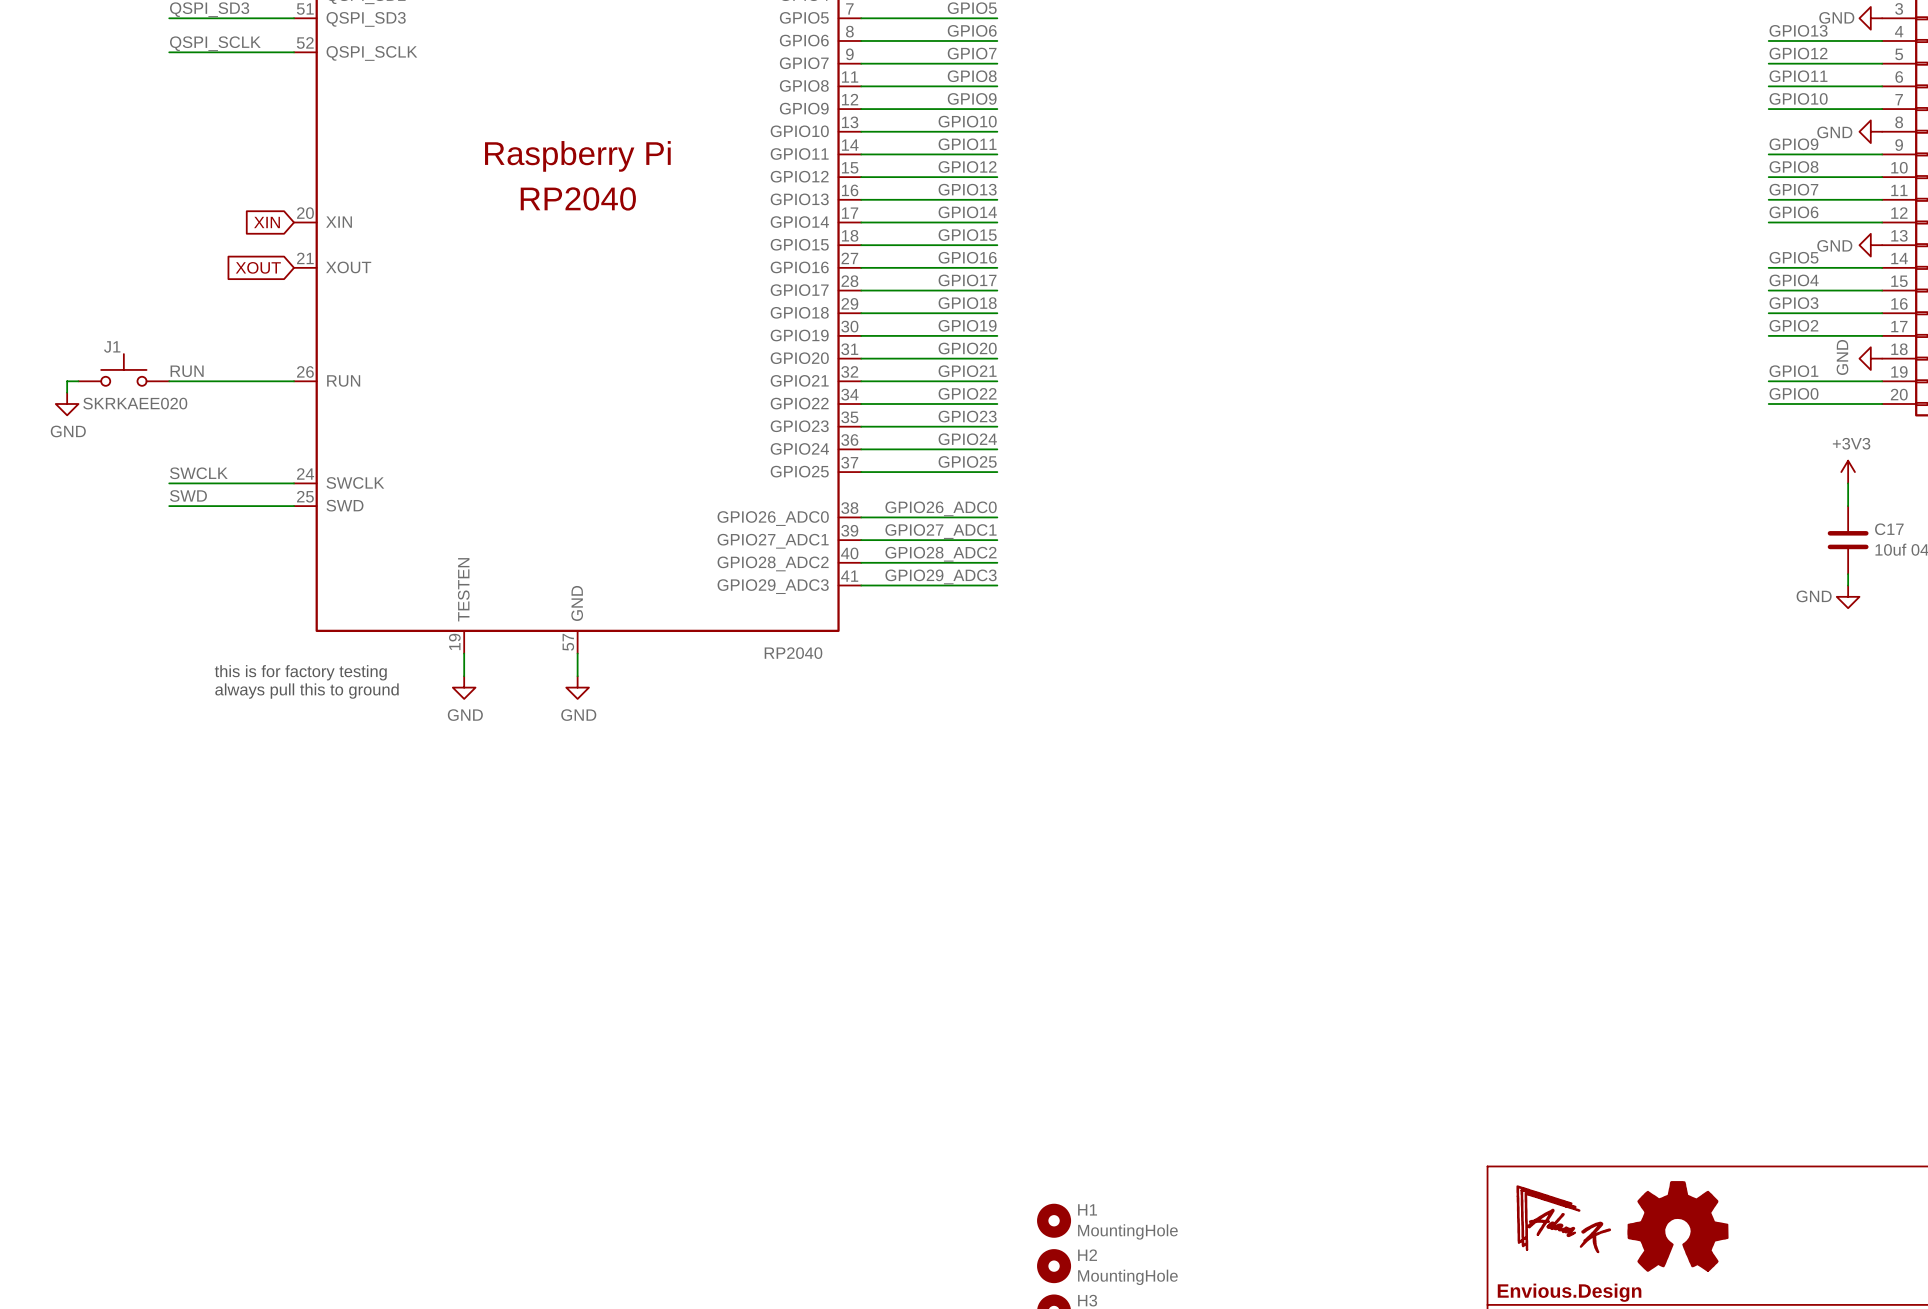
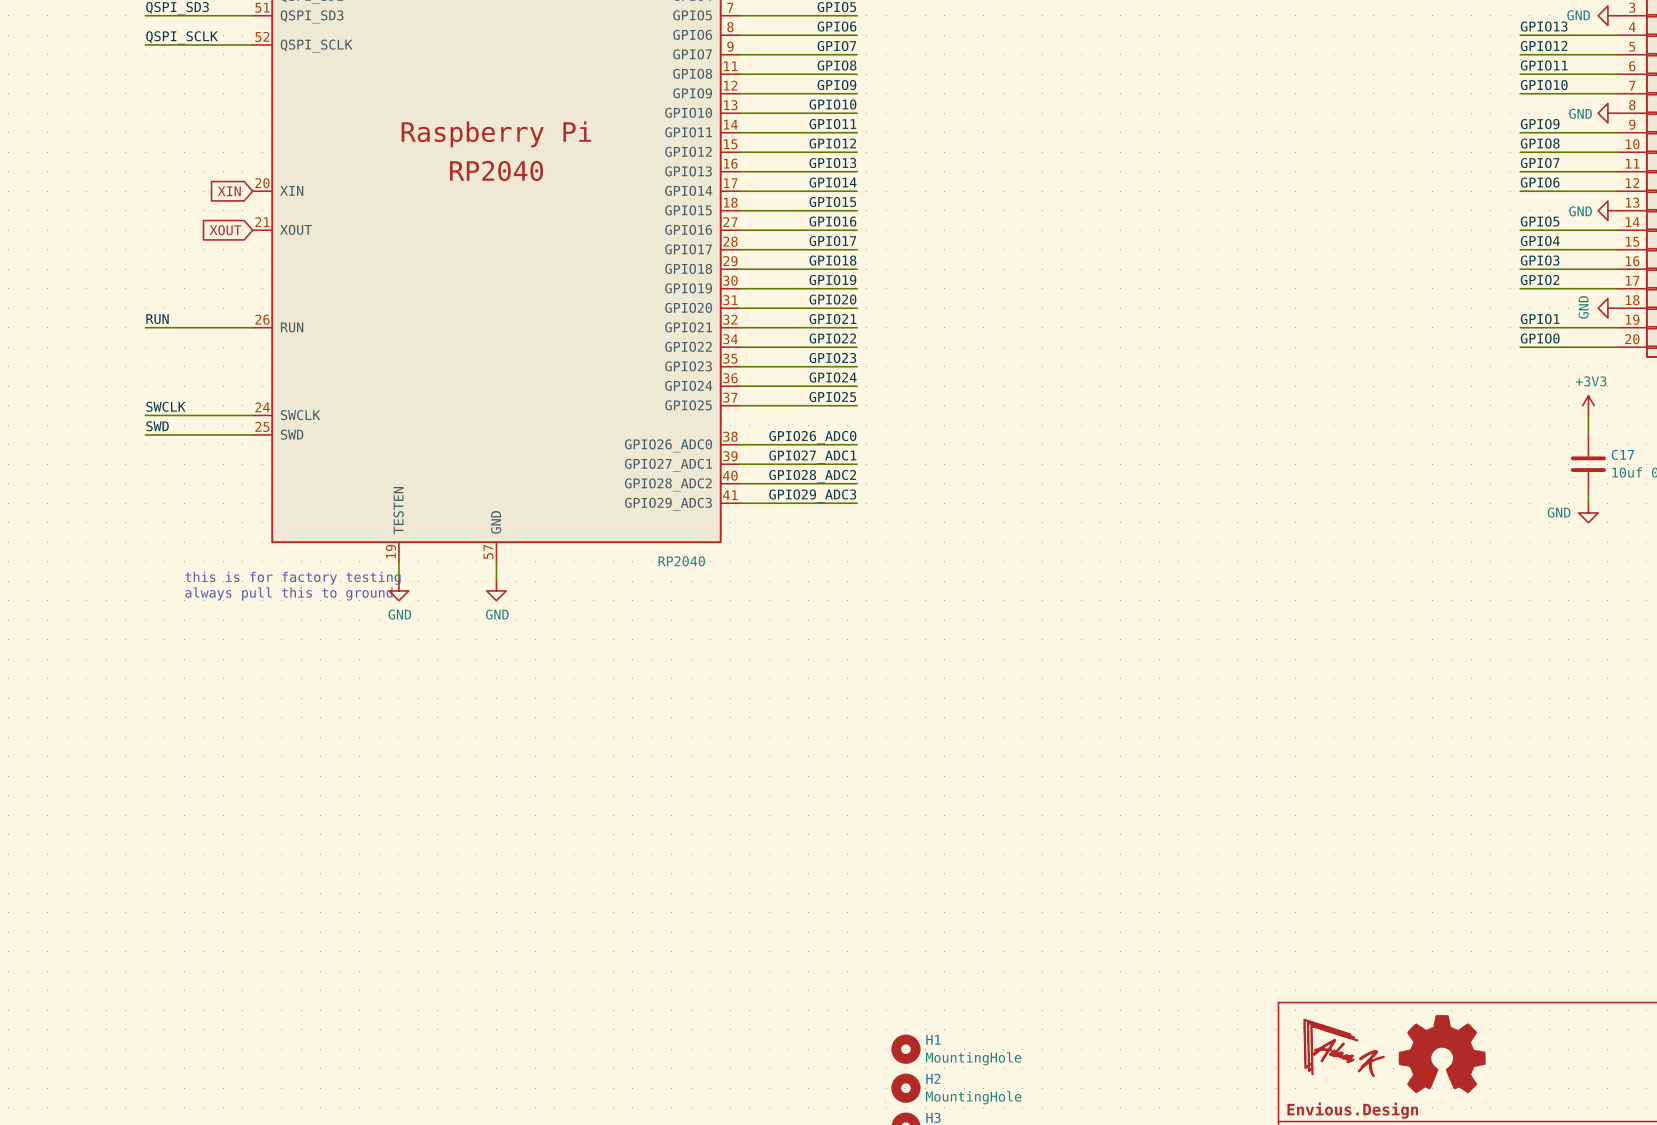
J1: SKRKAEE020 (123, 369) -> none
wire: (78, 381) (67, 381) (67, 392) -> none
power symbol: GND (67, 403) -> none

